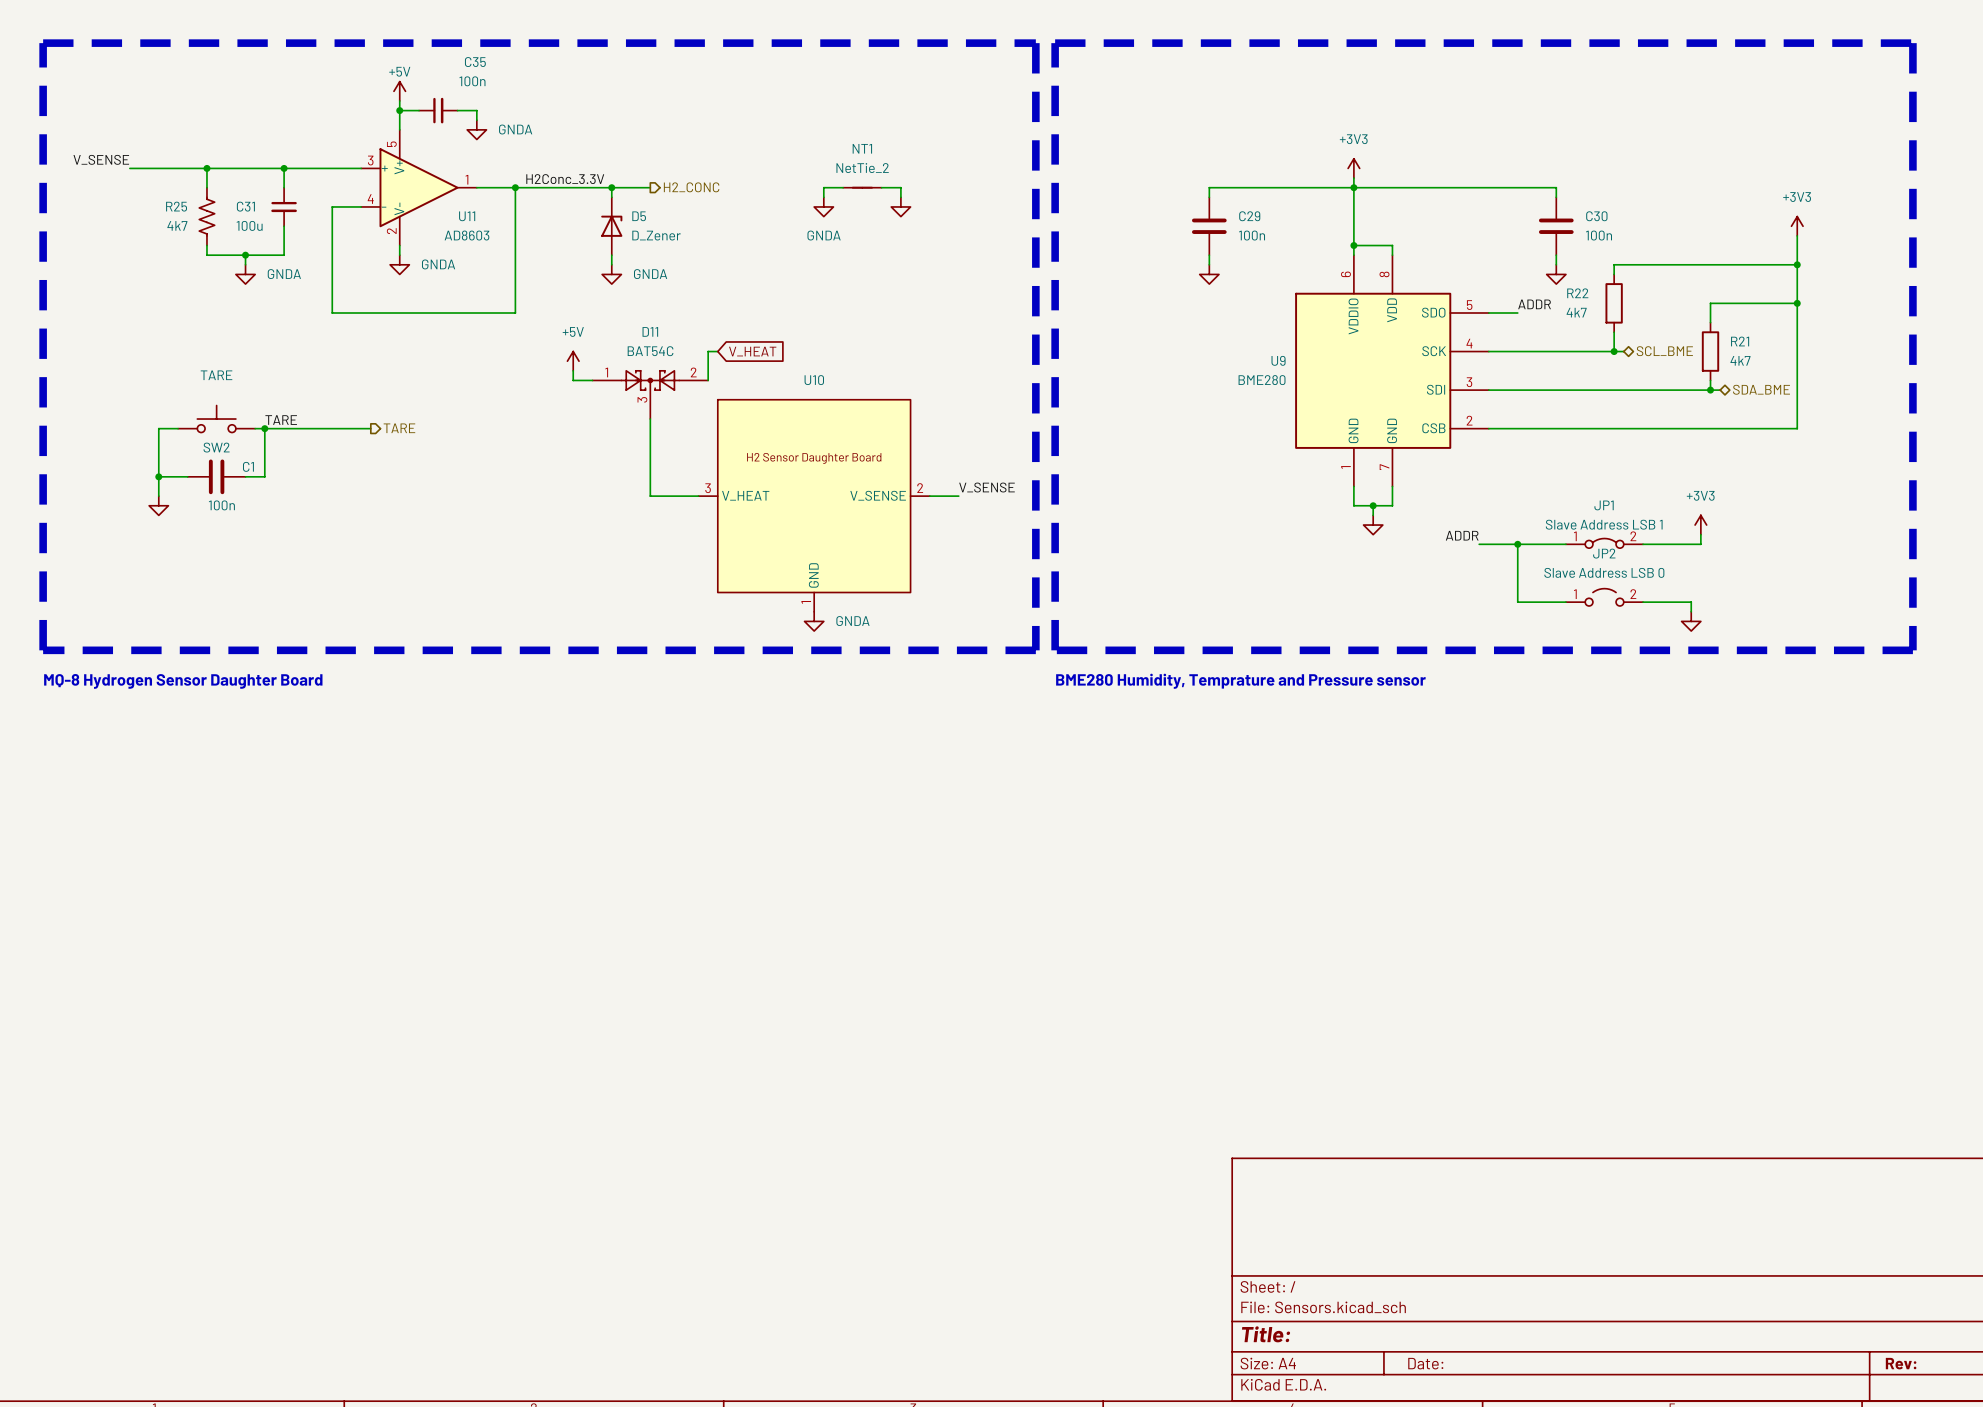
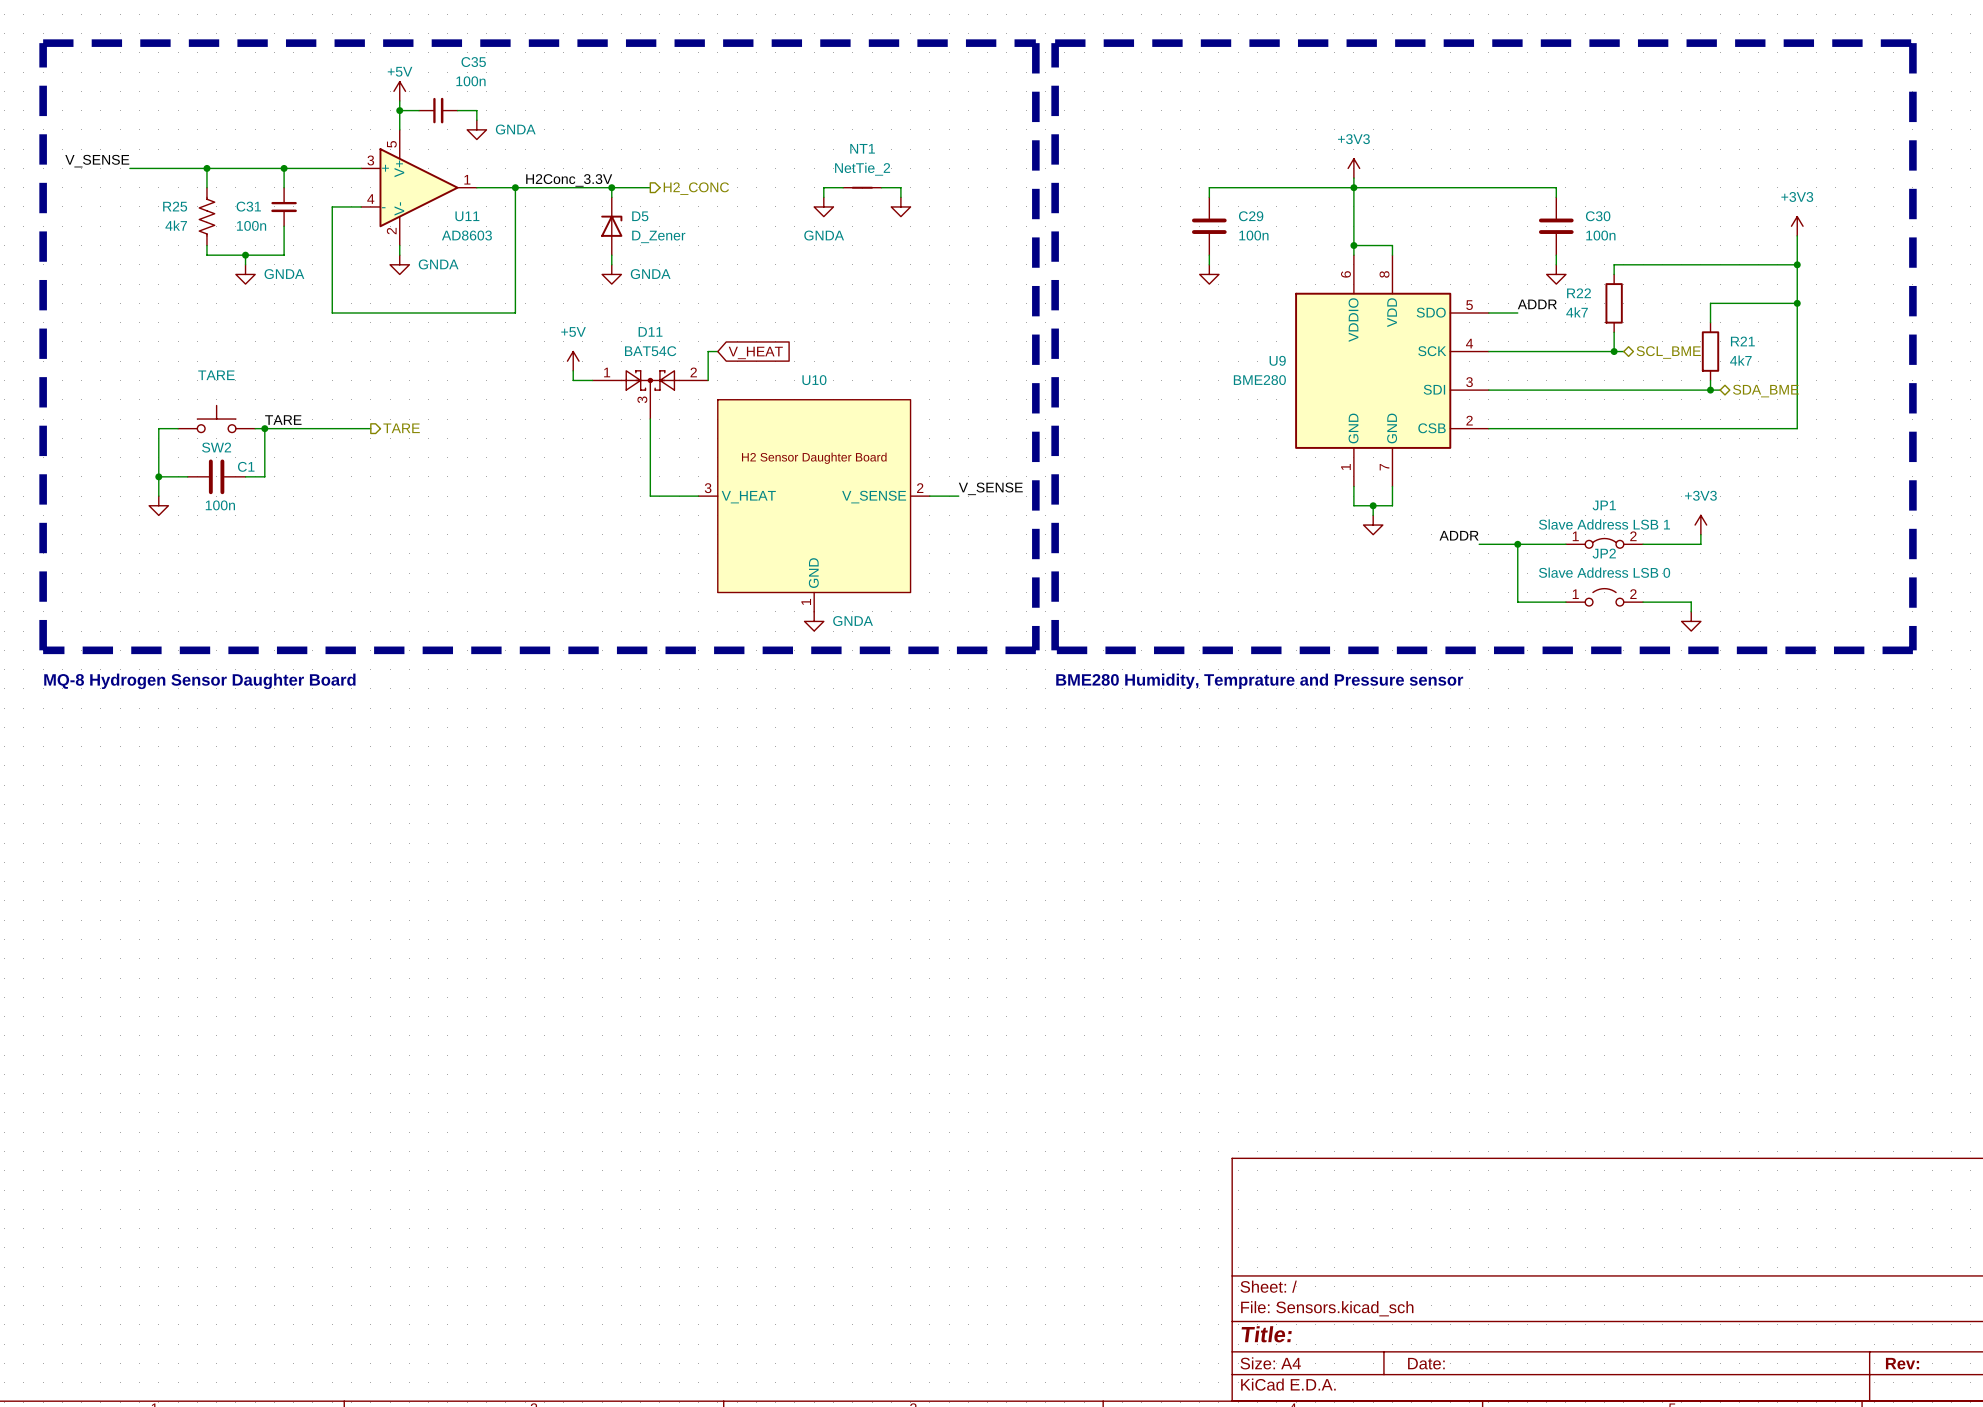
C31 value: 100u (249, 225) -> 100n (251, 225)

